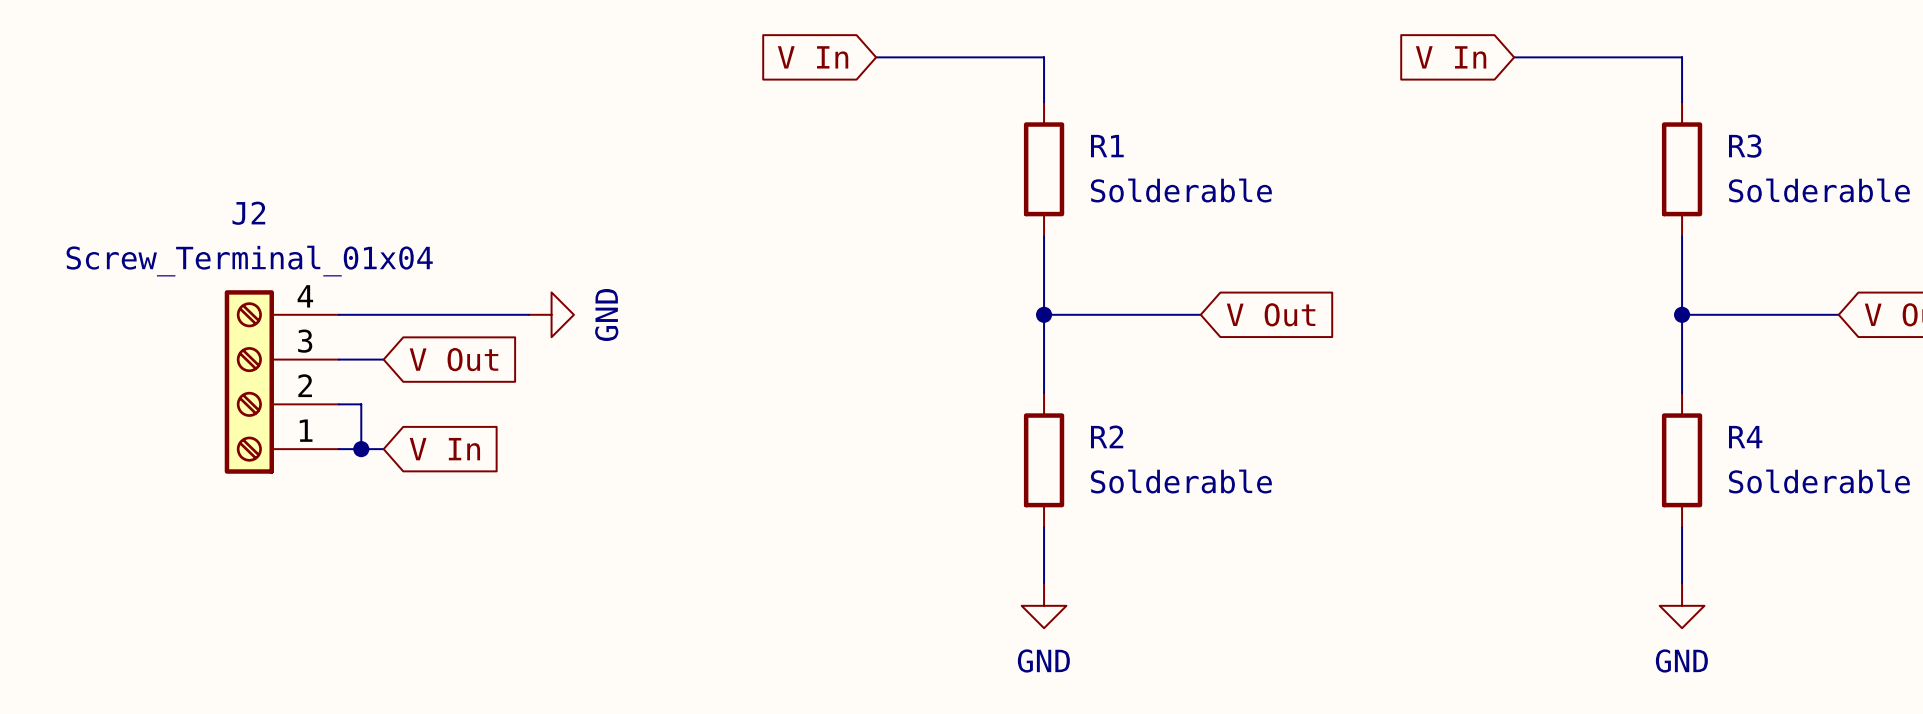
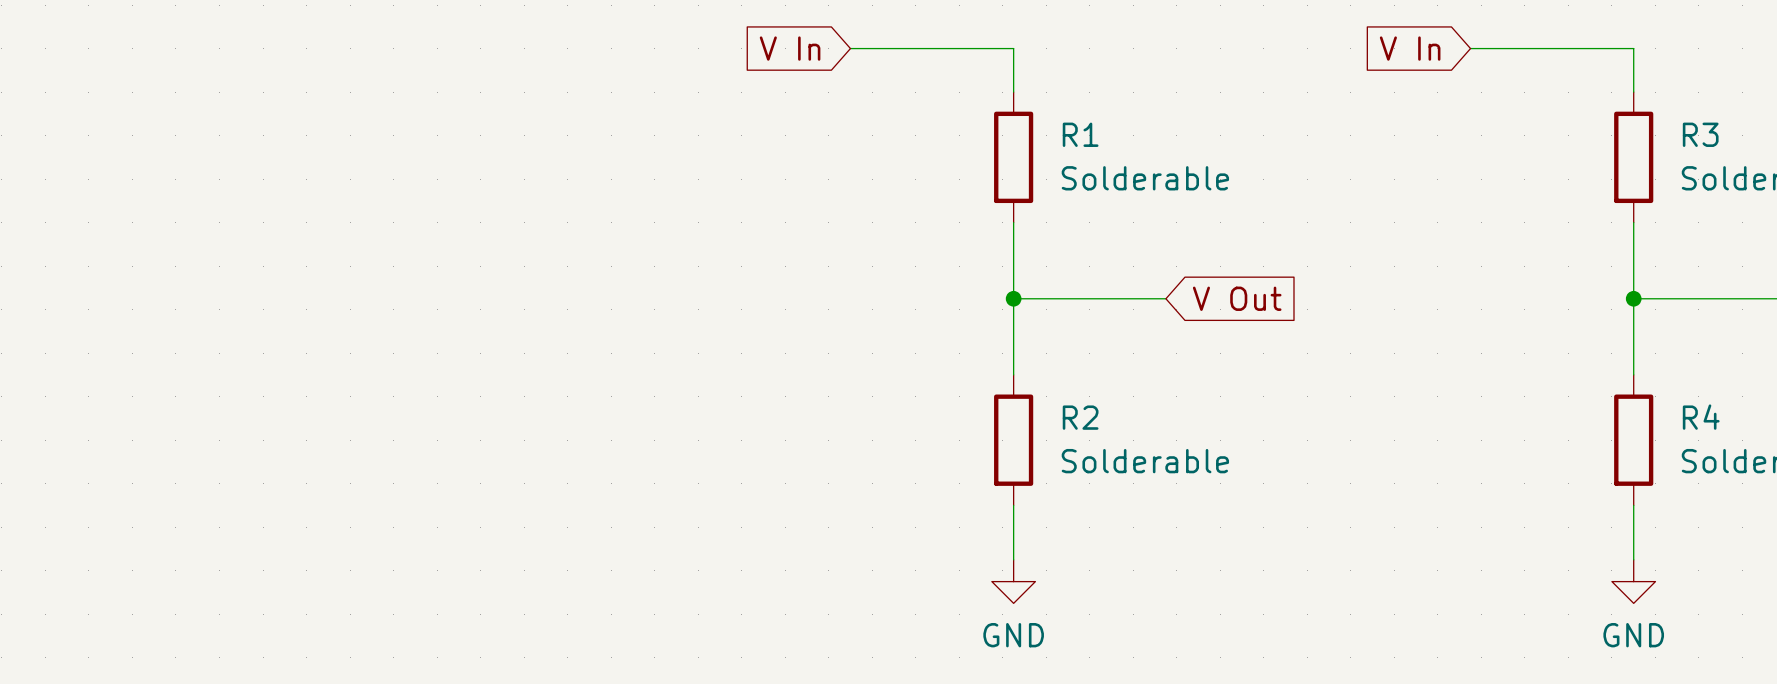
wire: (338, 314) (529, 314) -> none
power symbol: GND (551, 314) -> none
wire: (338, 359) (383, 359) -> none
global label: V Out (453, 359) -> none
J2: Screw_Terminal_01x04 (281, 381) -> none
wire: (338, 404) (361, 404) (361, 449) -> none
wire: (338, 449) (383, 449) -> none
junction: (361, 449) -> none
global label: V In (444, 449) -> none

